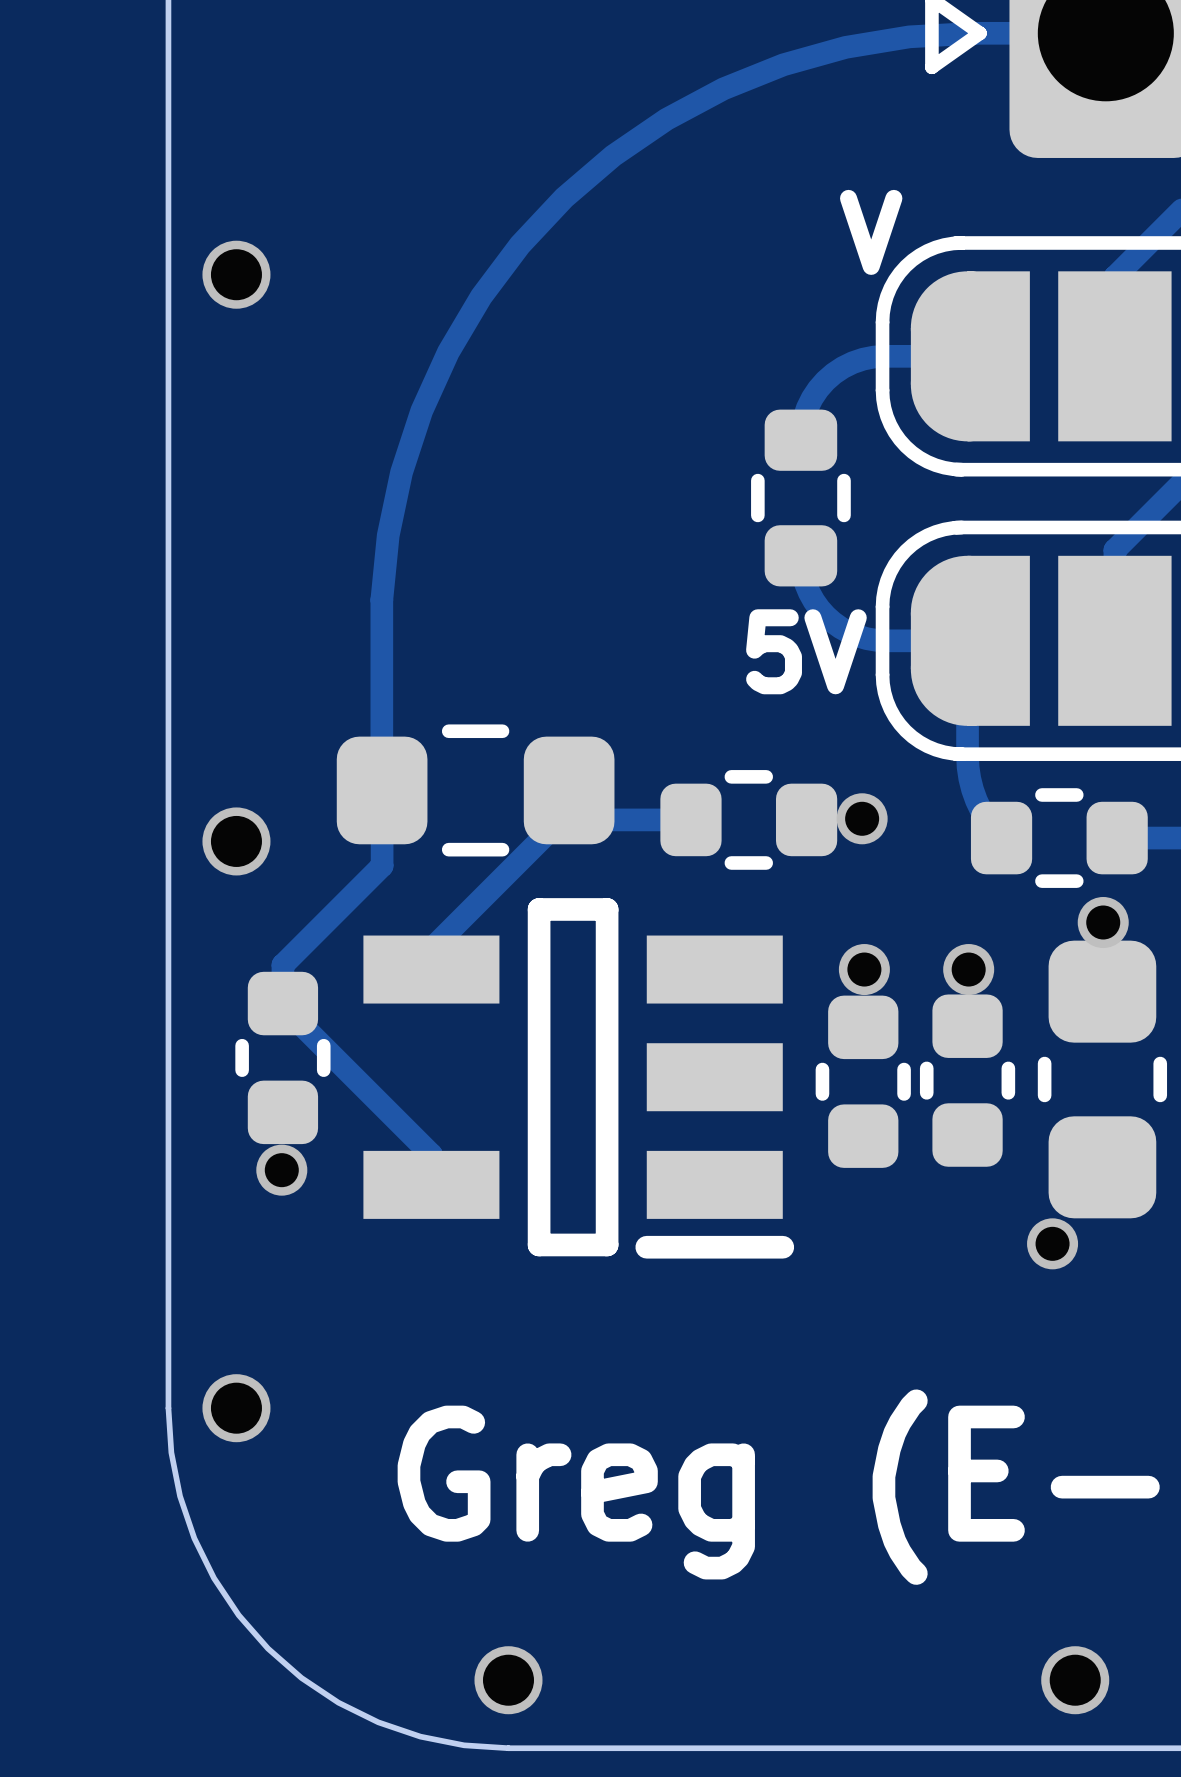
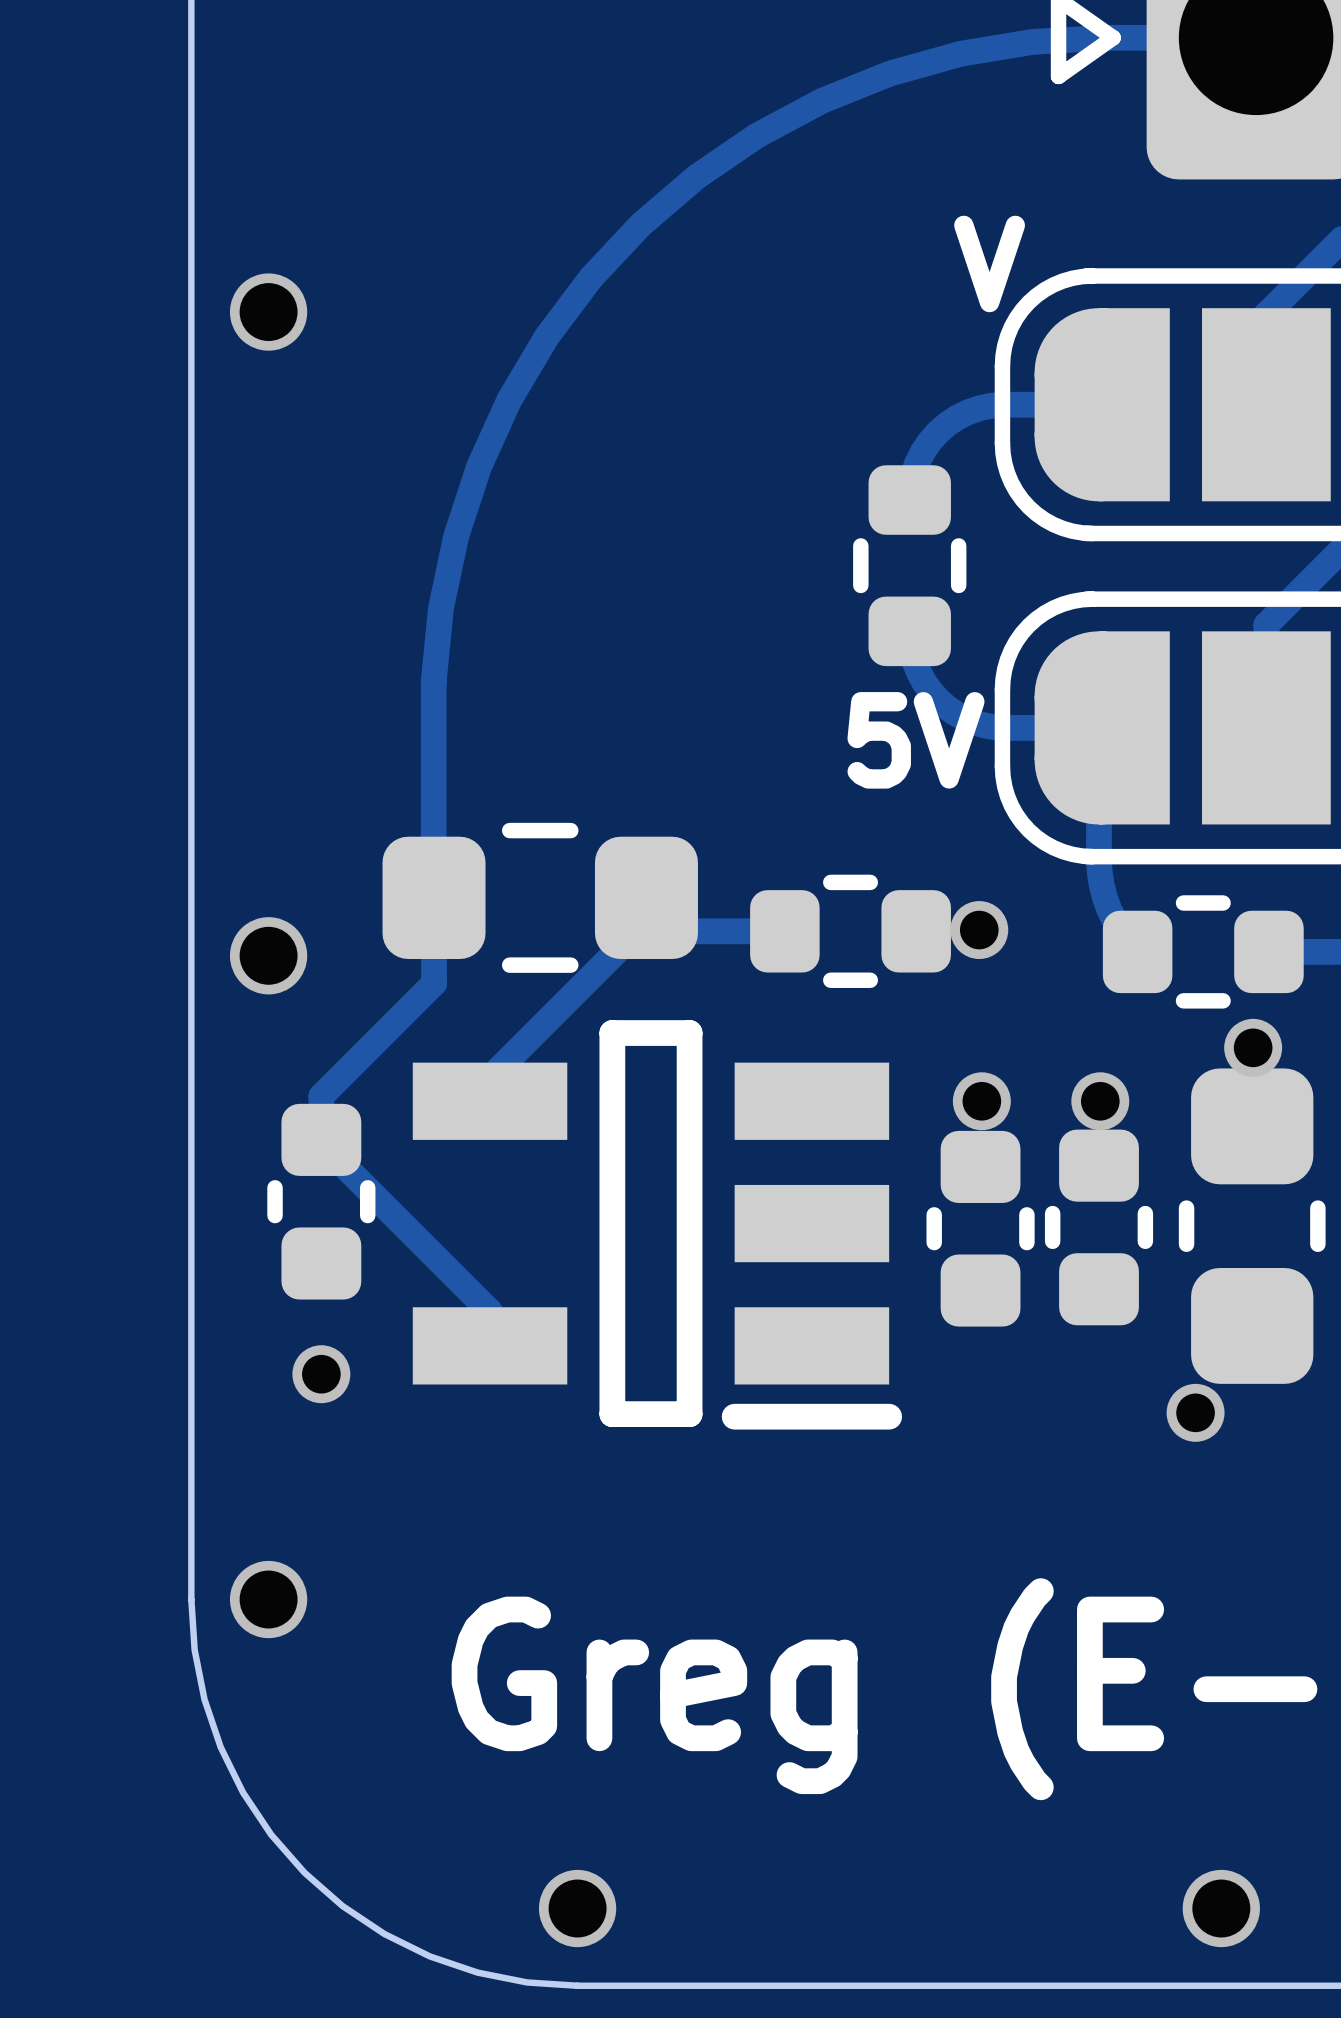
via position: (281, 1170) -> (321, 1374)

